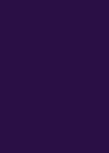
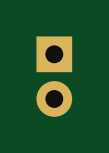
part: none -> (54, 76)

